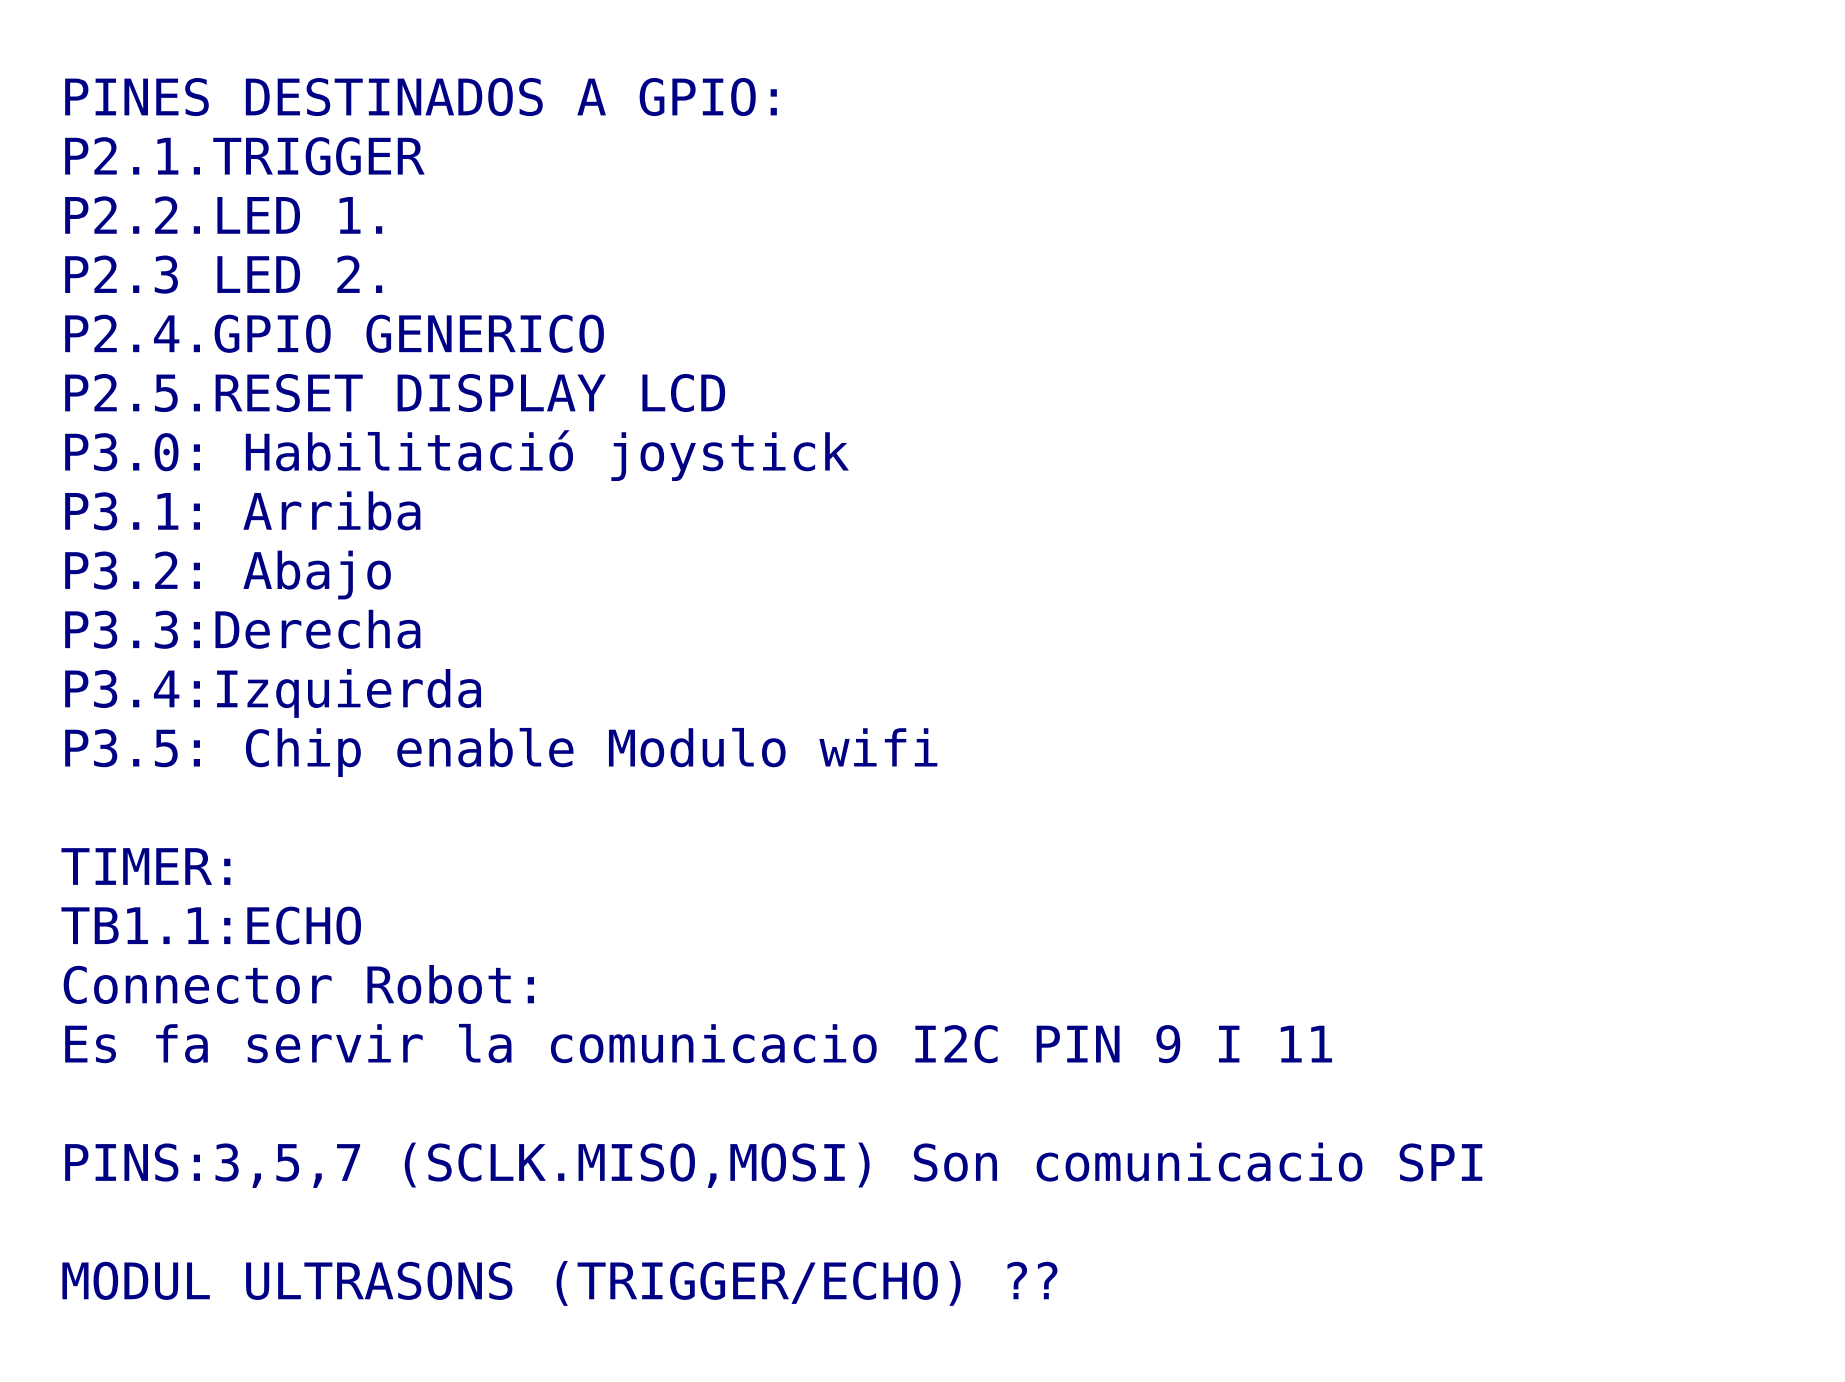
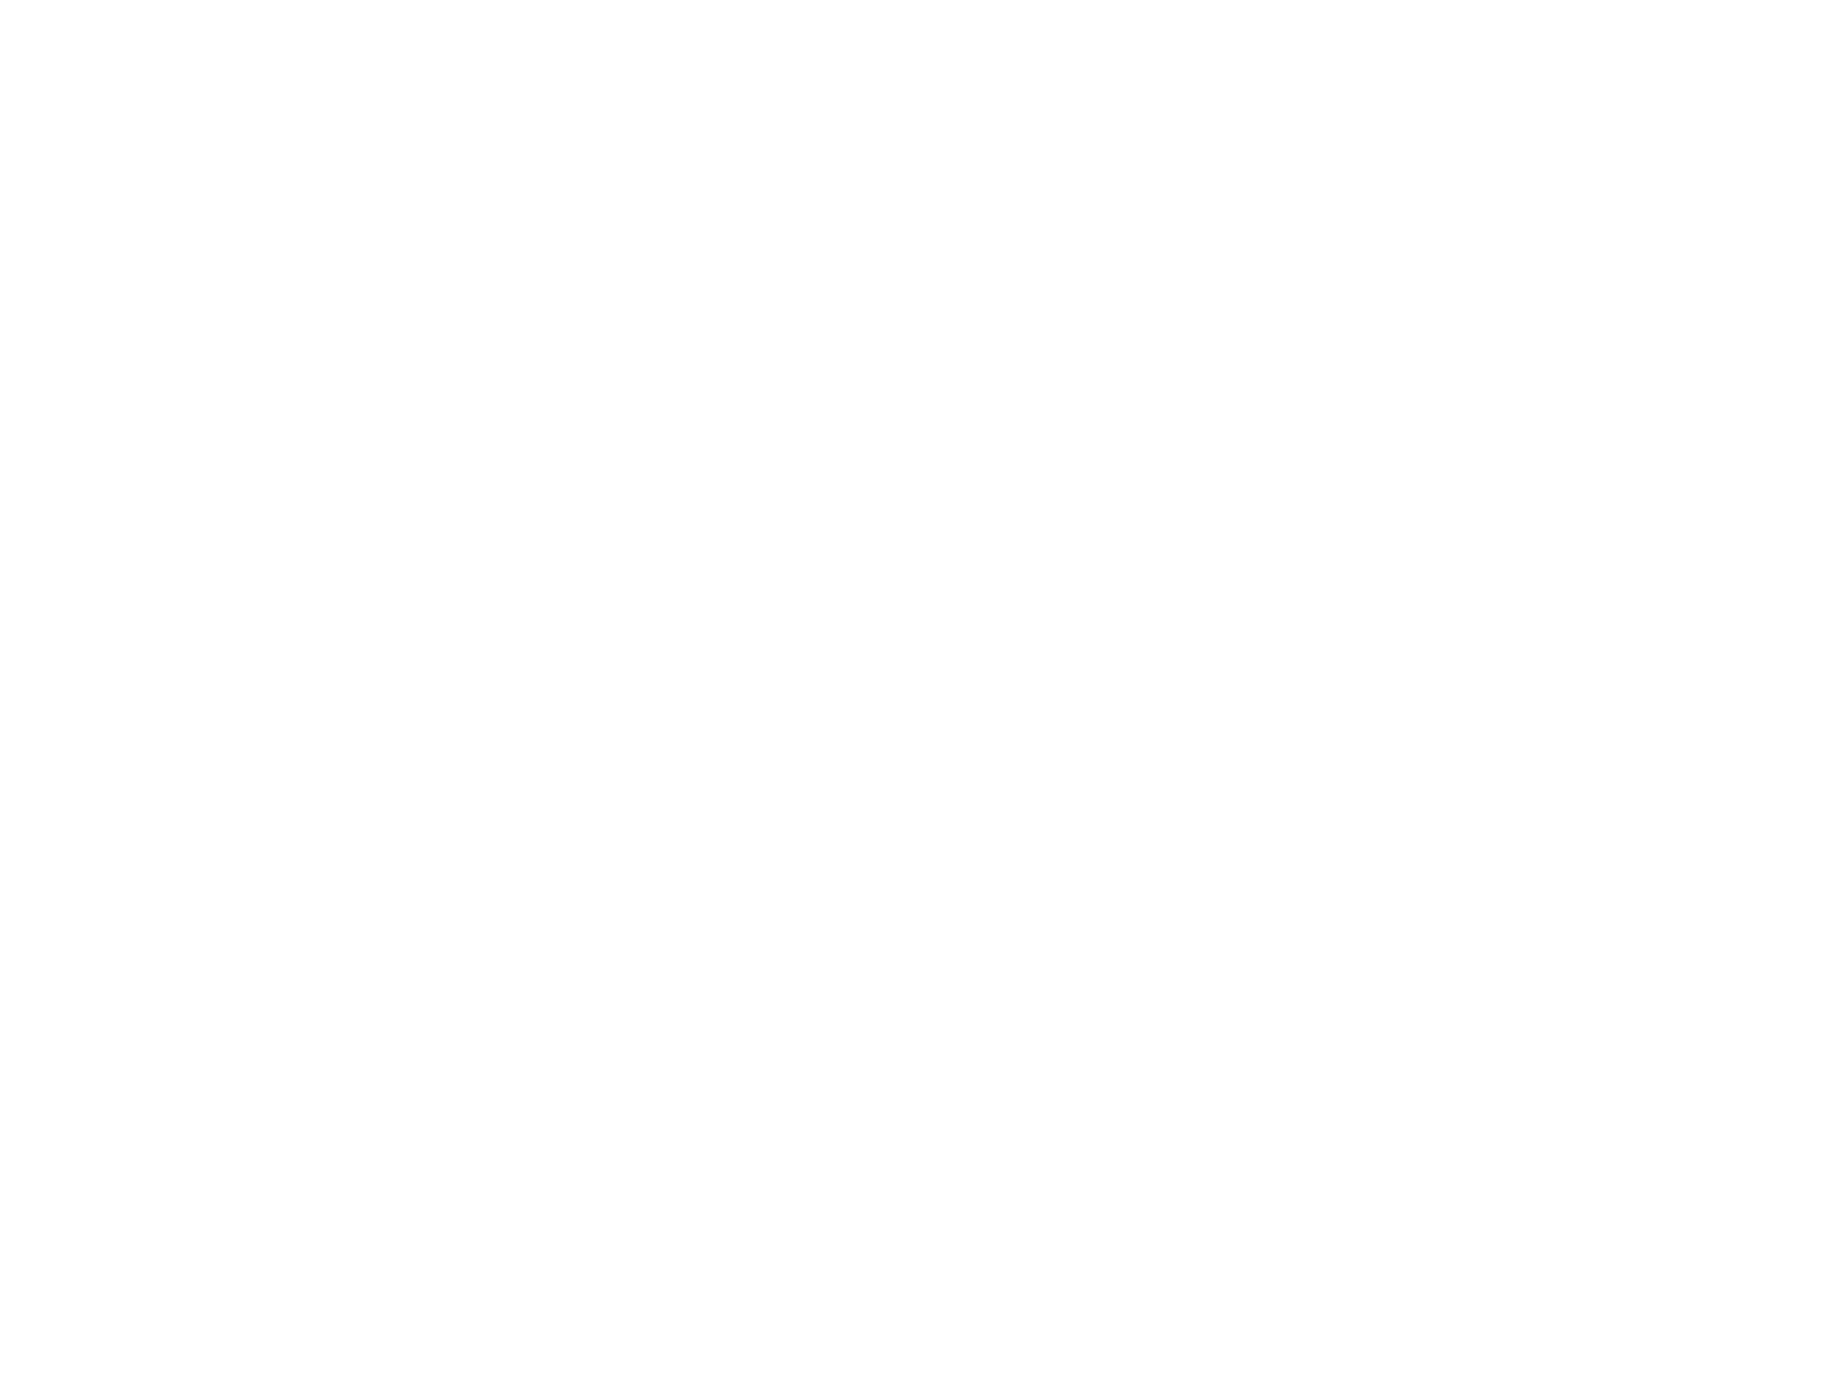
text: PINES DESTINADOS A GPIO: (421, 97) -> none
text: P2.1.TRIGGER (244, 156) -> none
text: P2.2.LED 1. (223, 215) -> none
text: P2.3 LED 2. (223, 274) -> none
text: P2.4.GPIO GENERICO (334, 333) -> none
text: P2.5.RESET DISPLAY LCD (395, 392) -> none
text: P3.0: Habilitació joystick (457, 455) -> none
text: P3.1: Arriba (242, 510) -> none
text: P3.2: Abajo (228, 575) -> none
text: P3.3:Derecha (242, 629) -> none
text: P3.4:Izquierda (273, 693) -> none
text: P3.5: Chip enable Modulo wifi (501, 752) -> none
text: TIMER: (145, 866) -> none
text: TB1.1:ECHO (211, 925) -> none
text: Connector Robot: (298, 984) -> none
text: Es fa servir la comunicacio I2C PIN 9 I 11 (698, 1043) -> none
text: PINS:3,5,7 (SCLK.MISO,MOSI) Son comunicacio SPI (773, 1165) -> none
text: MODUL ULTRASONS (TRIGGER/ECHO) ?? (559, 1283) -> none

